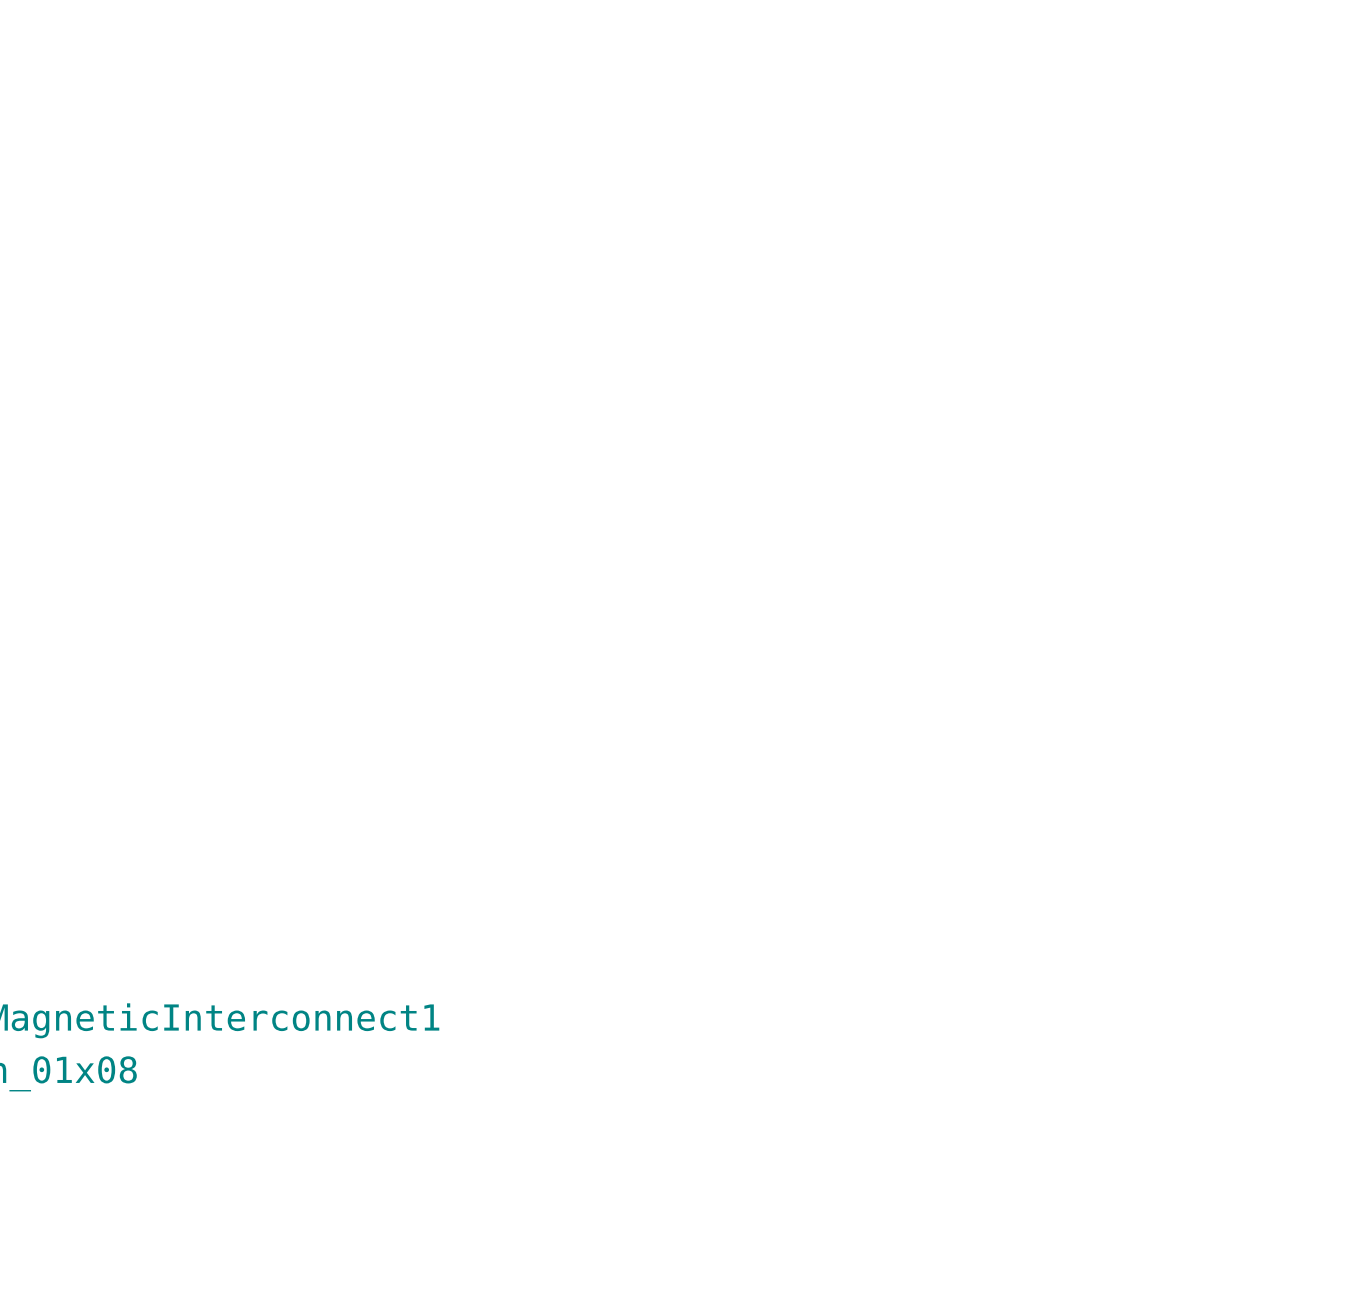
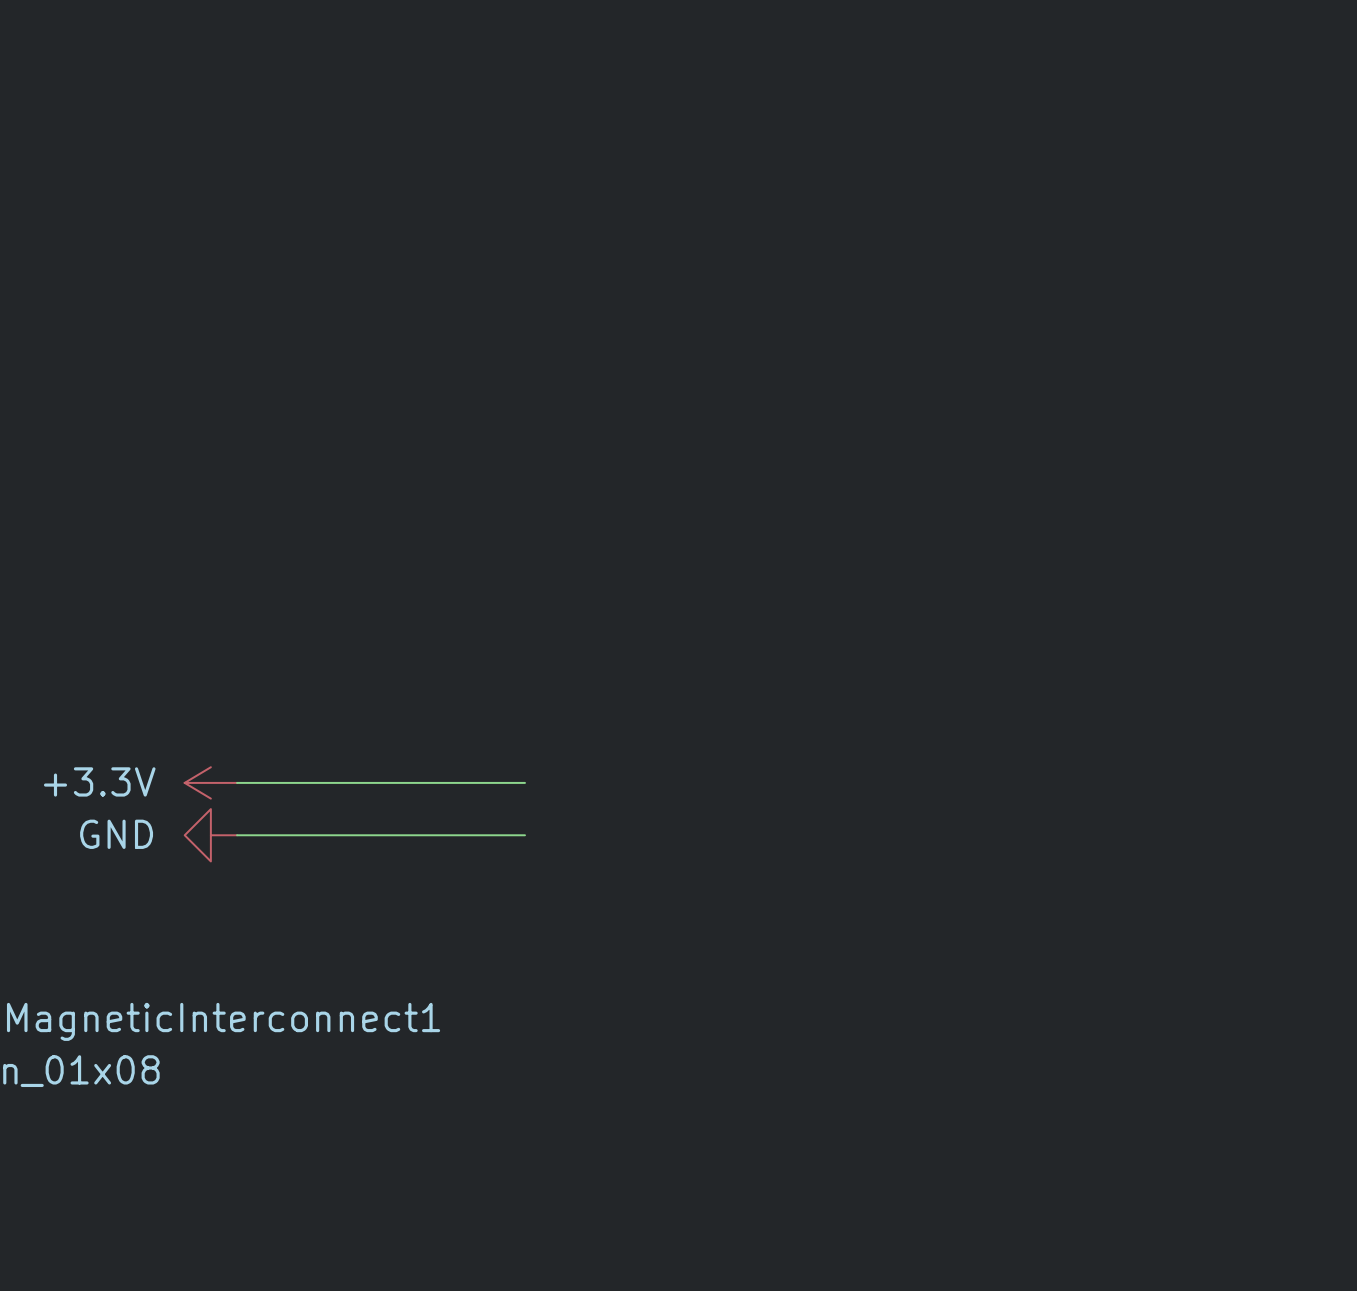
power symbol: none -> +3.3V (210, 782)
wire: none -> (237, 782) (524, 782)
power symbol: none -> GND (210, 835)
wire: none -> (237, 835) (524, 835)

